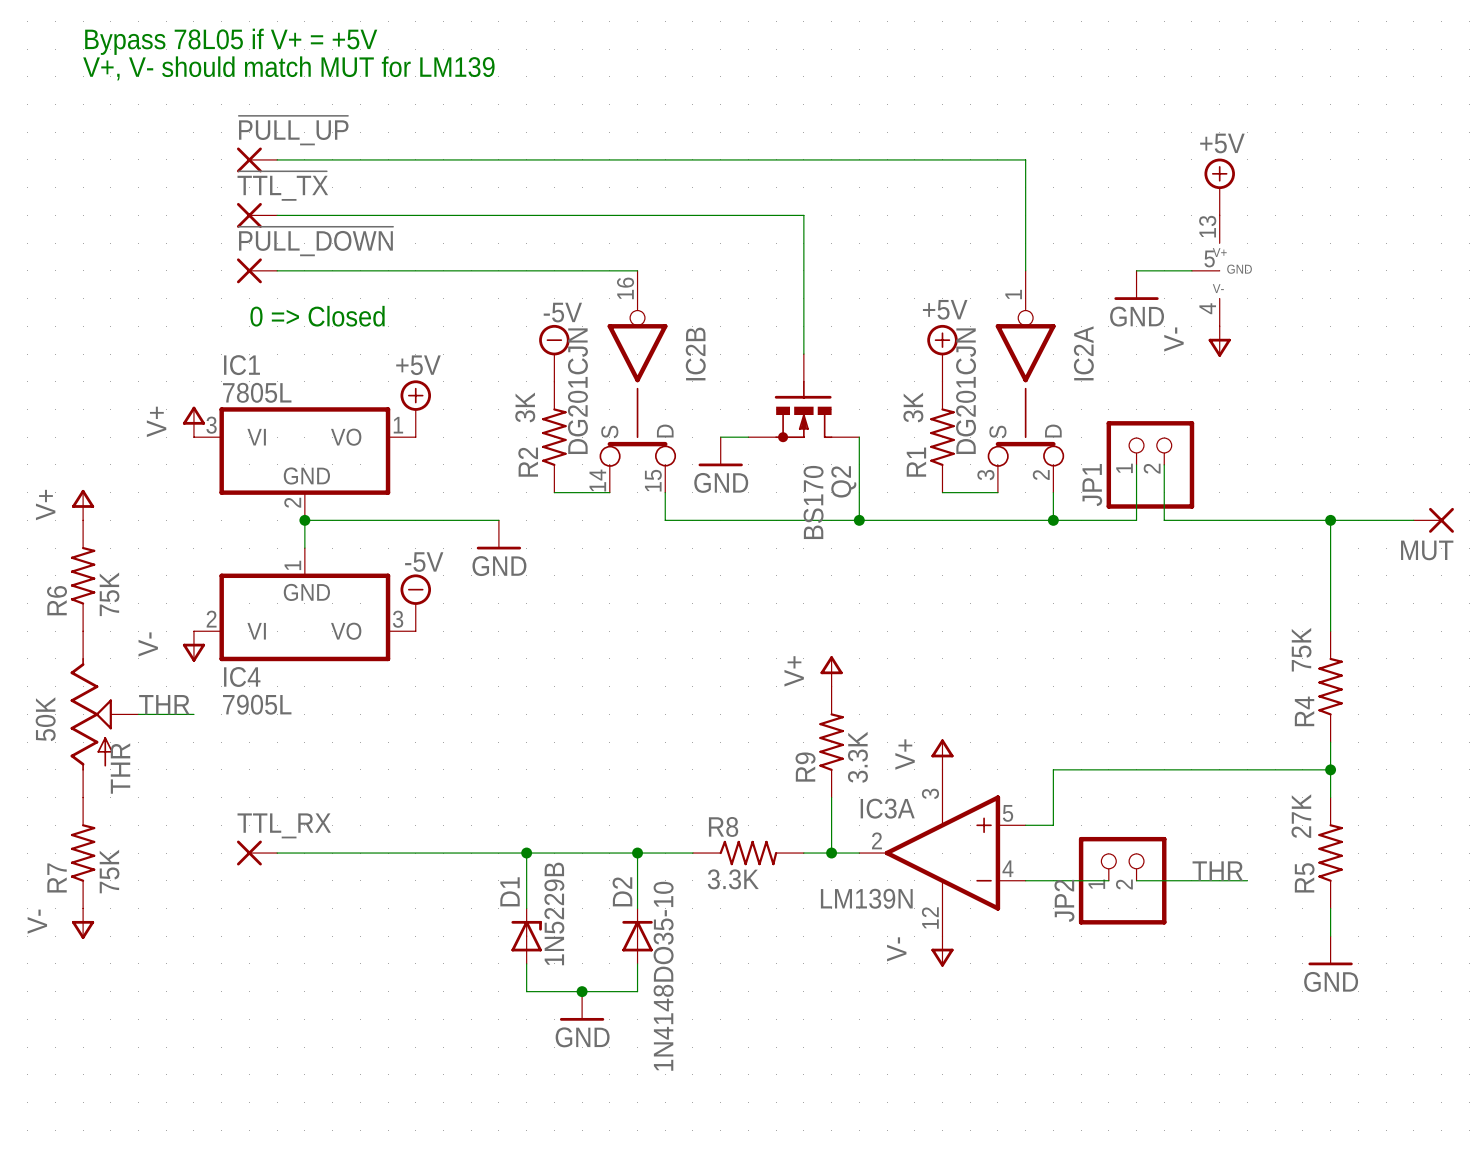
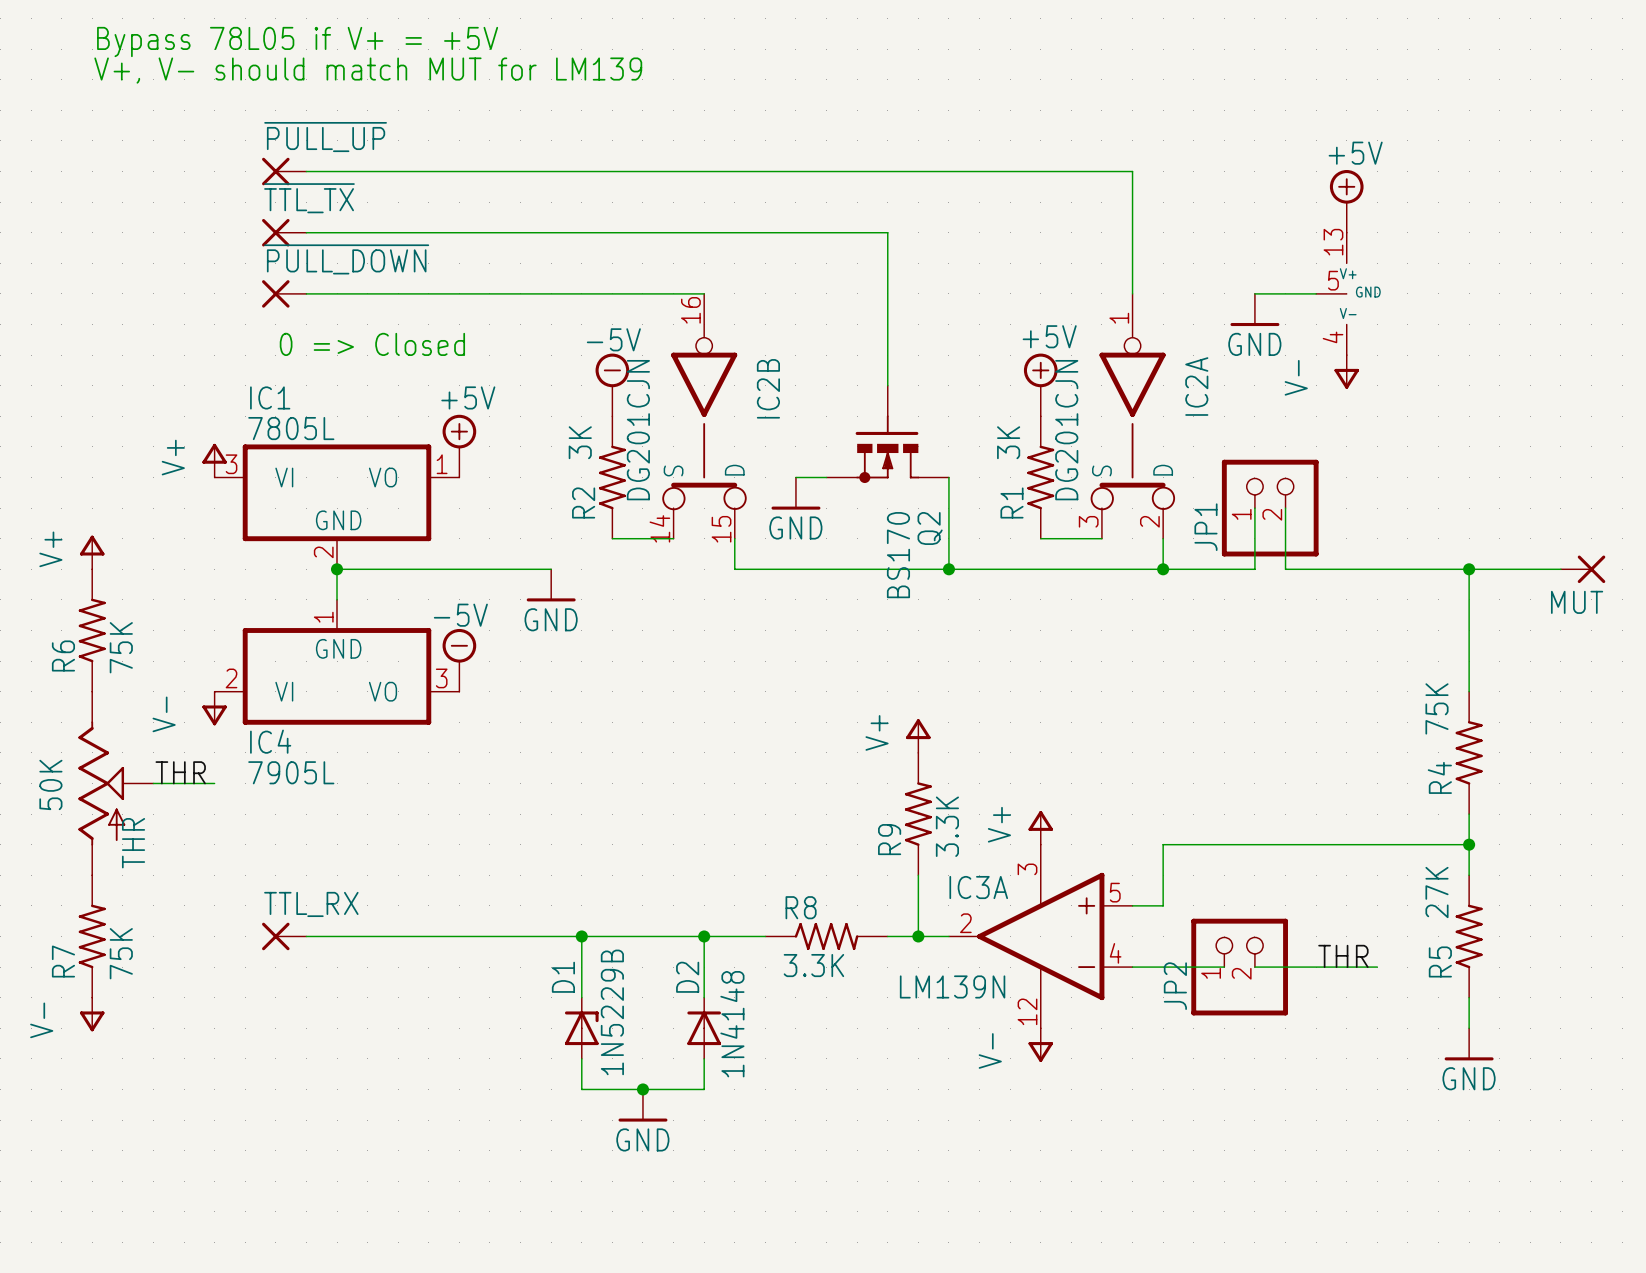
D2 value: 1N4148DO35-10 (663, 976) -> 1N4148 (732, 1024)

